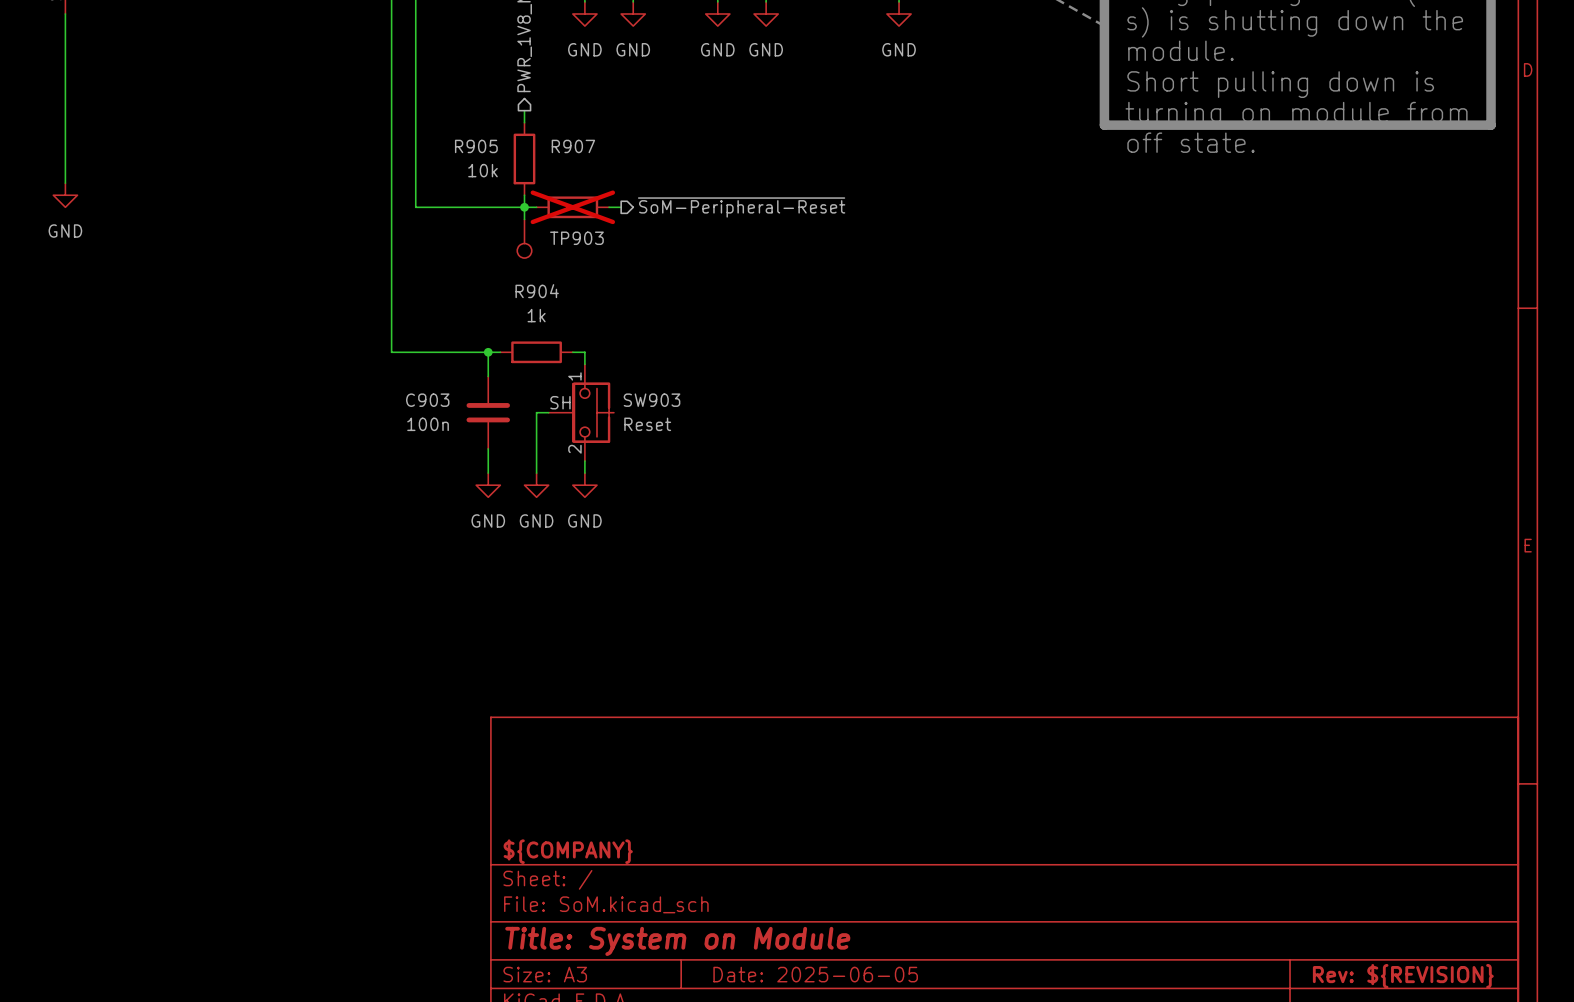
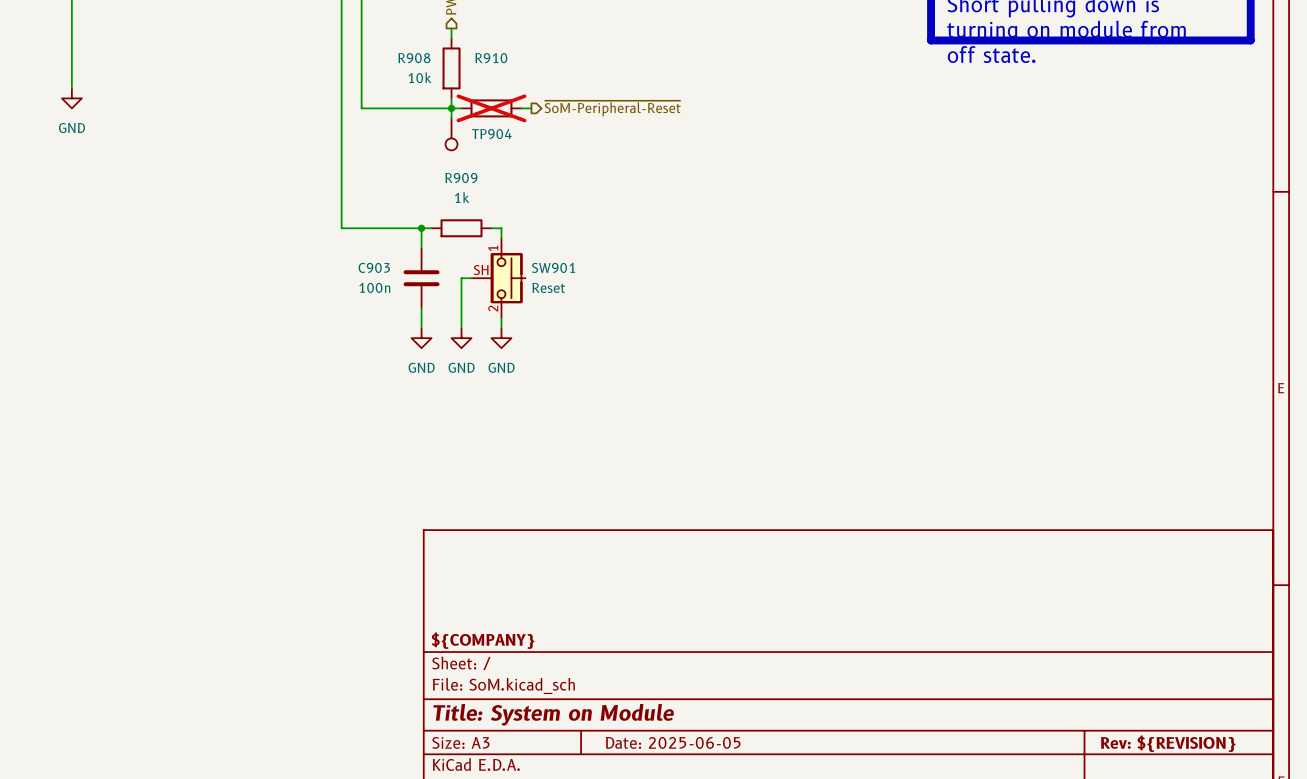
R905 name: R905 (476, 146) -> R908 (414, 58)
R907 name: R907 (573, 146) -> R910 (491, 58)
TP903 name: TP903 (576, 238) -> TP904 (491, 134)
R904 name: R904 (537, 291) -> R909 (461, 178)
SW903 name: SW903 (652, 400) -> SW901 (553, 267)

